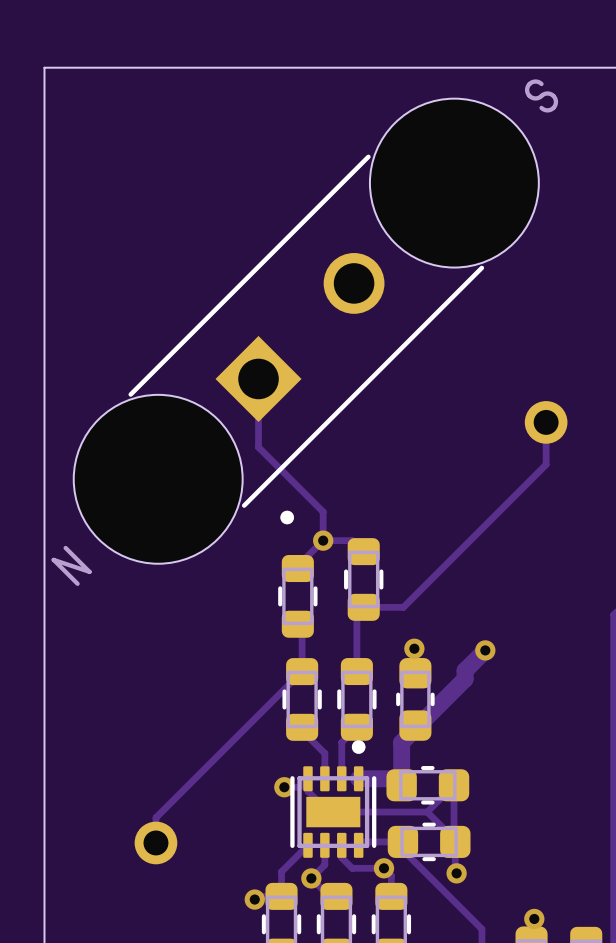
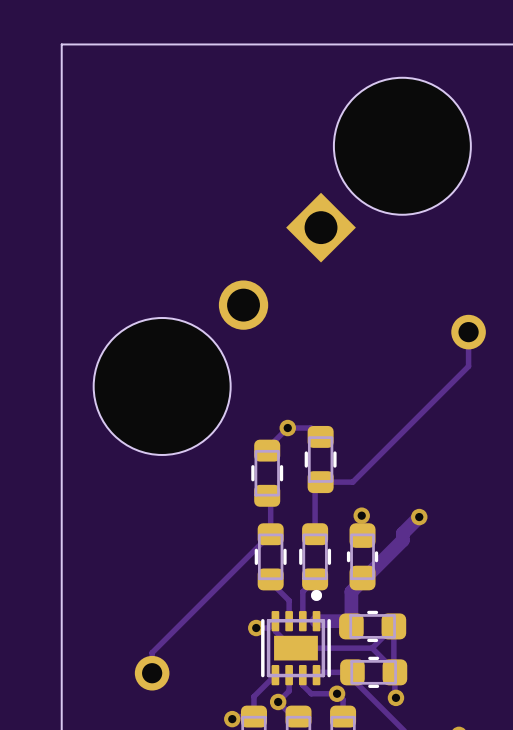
part side: top (304, 332) -> bottom (282, 266)
track: (258, 378) (258, 447) (323, 511) (323, 540) -> none

